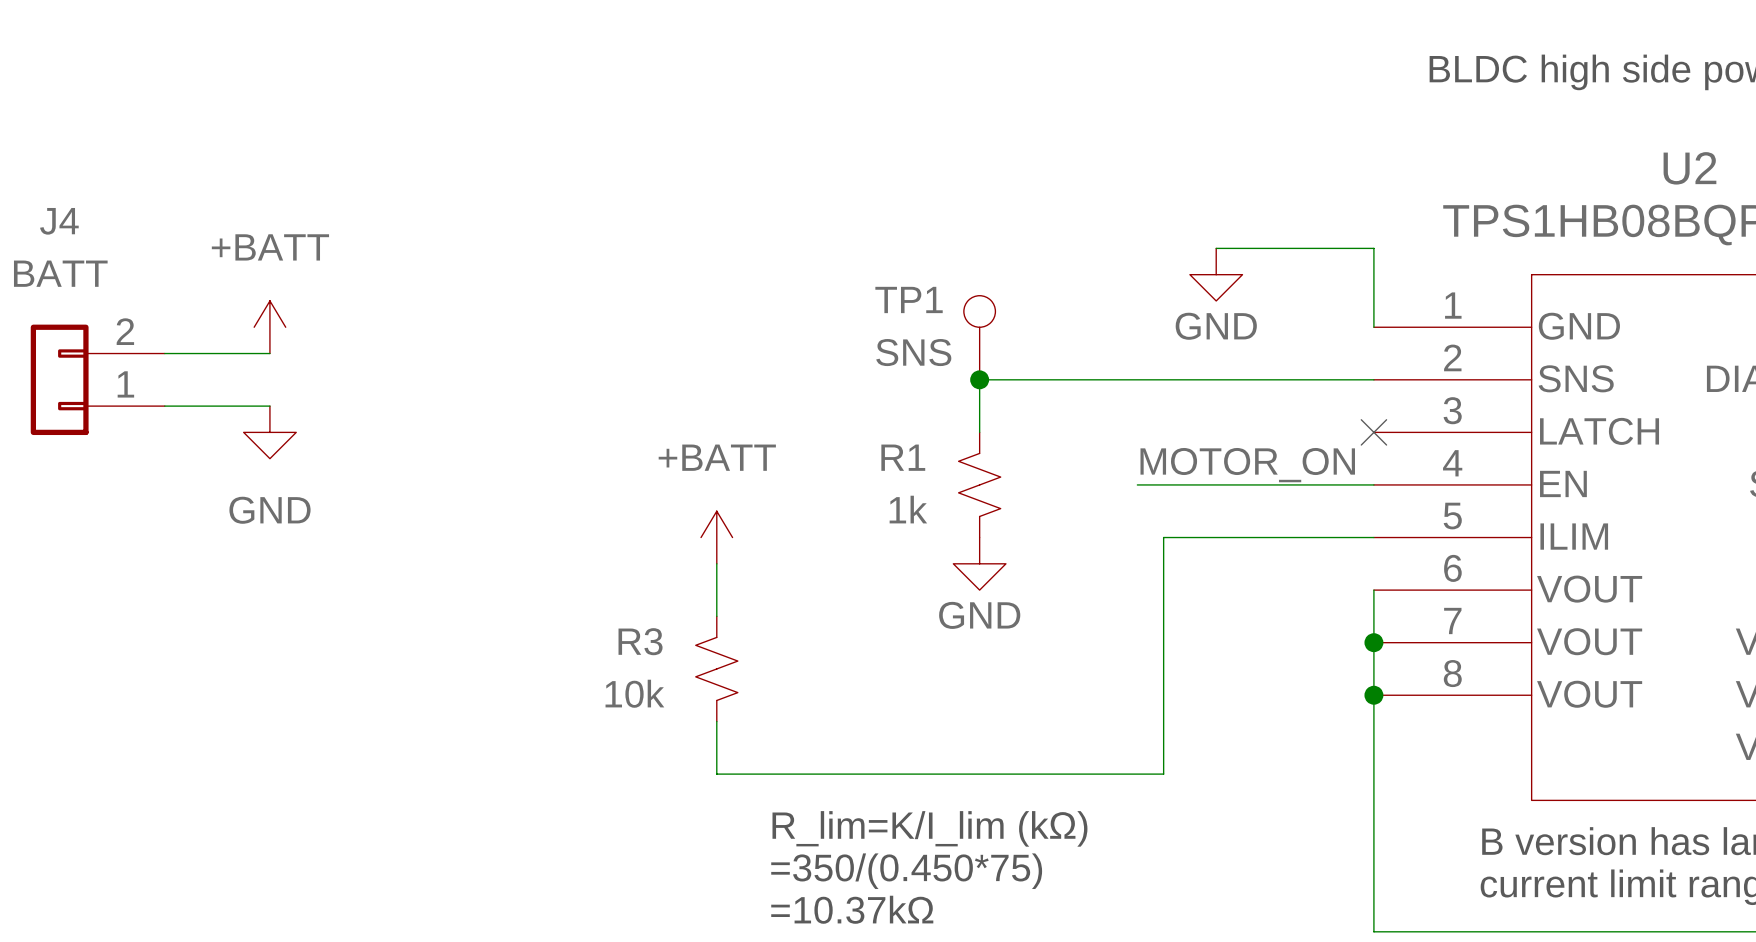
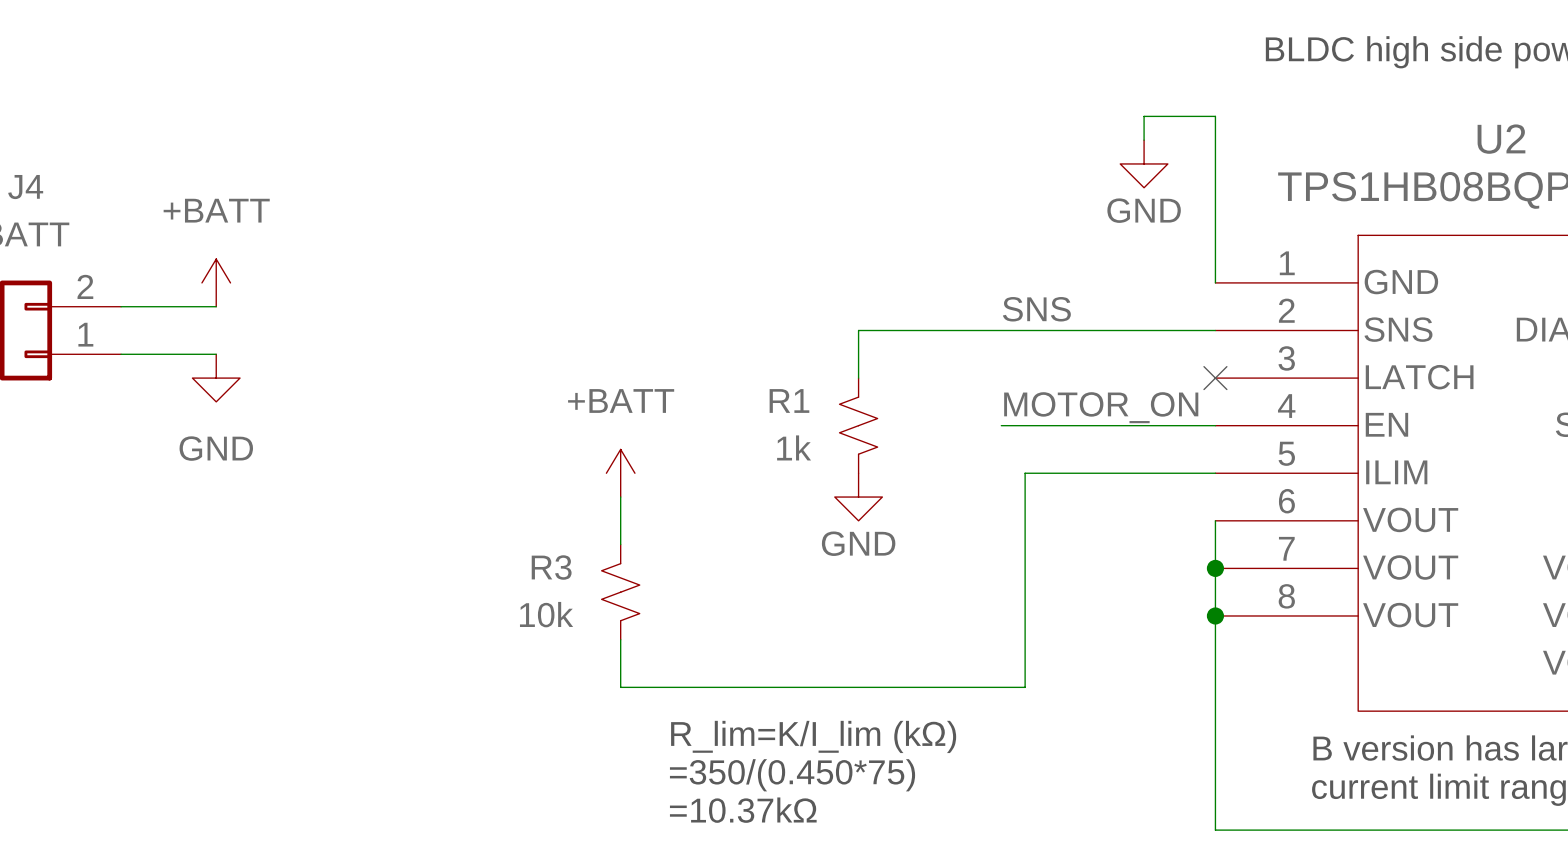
wire: (1216, 248) (1373, 248) -> (1144, 140) (1144, 116) (1215, 116) (1215, 211)
power symbol position: GND (1216, 274) -> GND (1144, 163)
TP1: SNS (979, 337) -> none
label: none -> SNS (1036, 309)
junction: (979, 379) -> none

